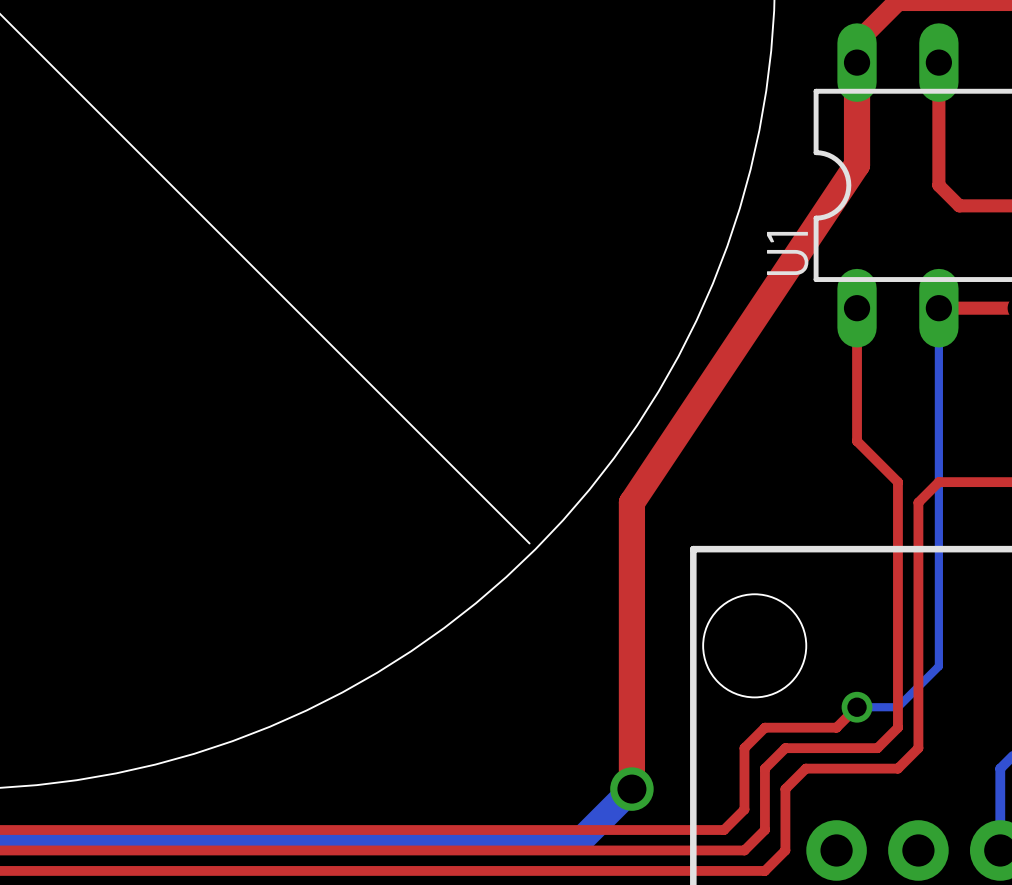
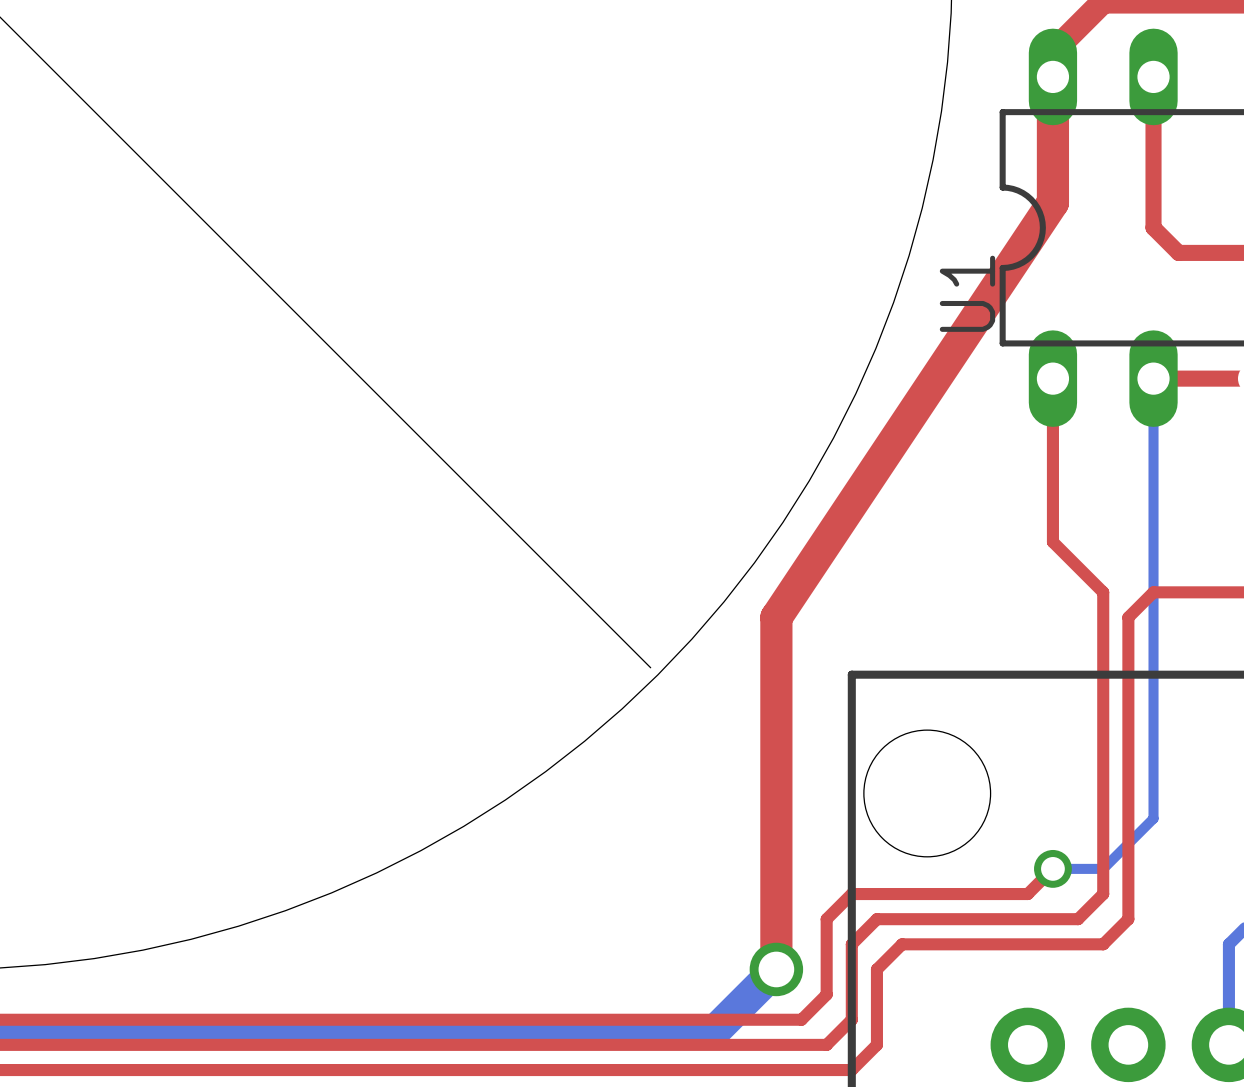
top track: (764, 727) (744, 748) (744, 809) (724, 830) (652, 830) -> (939, 894) (851, 894) (826, 919) (826, 994) (801, 1019)
top track: (785, 748) (764, 768) (764, 830) (744, 850) (672, 850) -> (964, 919) (876, 919) (851, 944) (851, 1019) (826, 1044)
top track: (805, 768) (785, 789) (785, 850) (764, 870) (693, 870) -> (990, 944) (902, 944) (876, 969) (876, 1044) (851, 1070)

